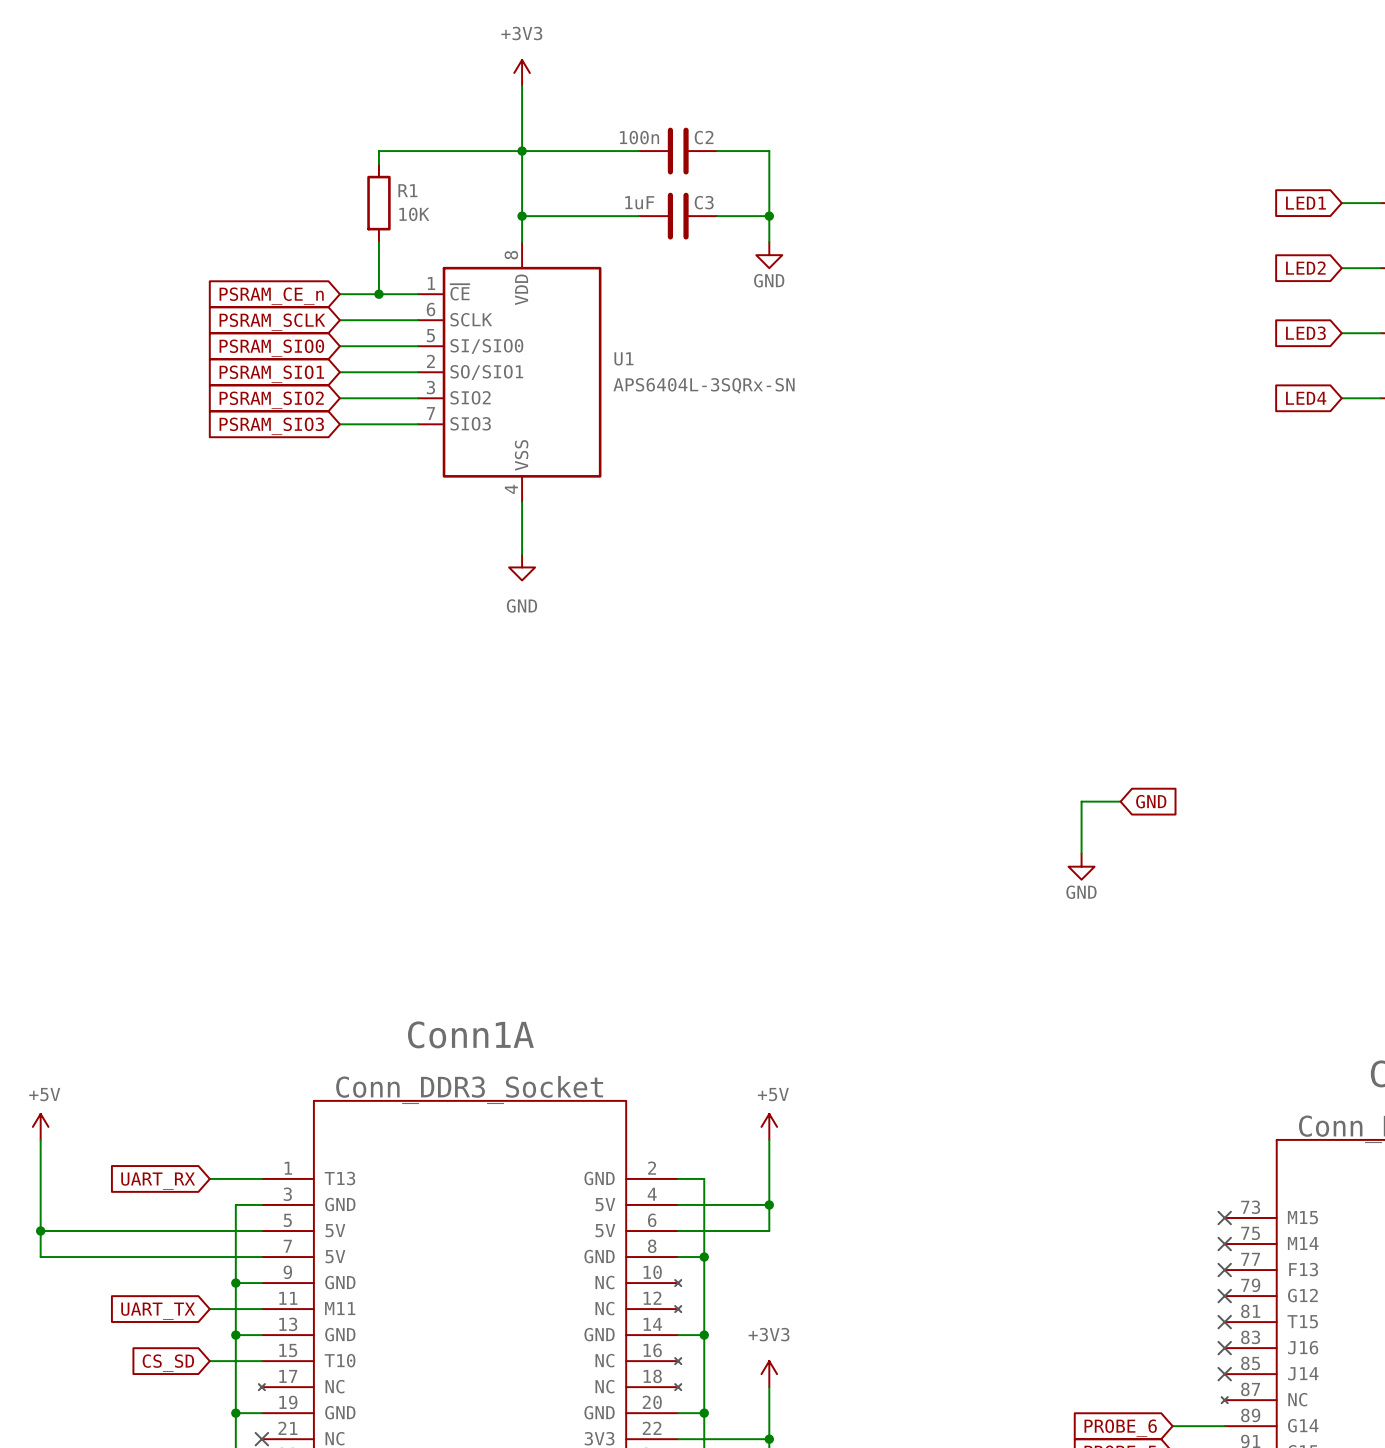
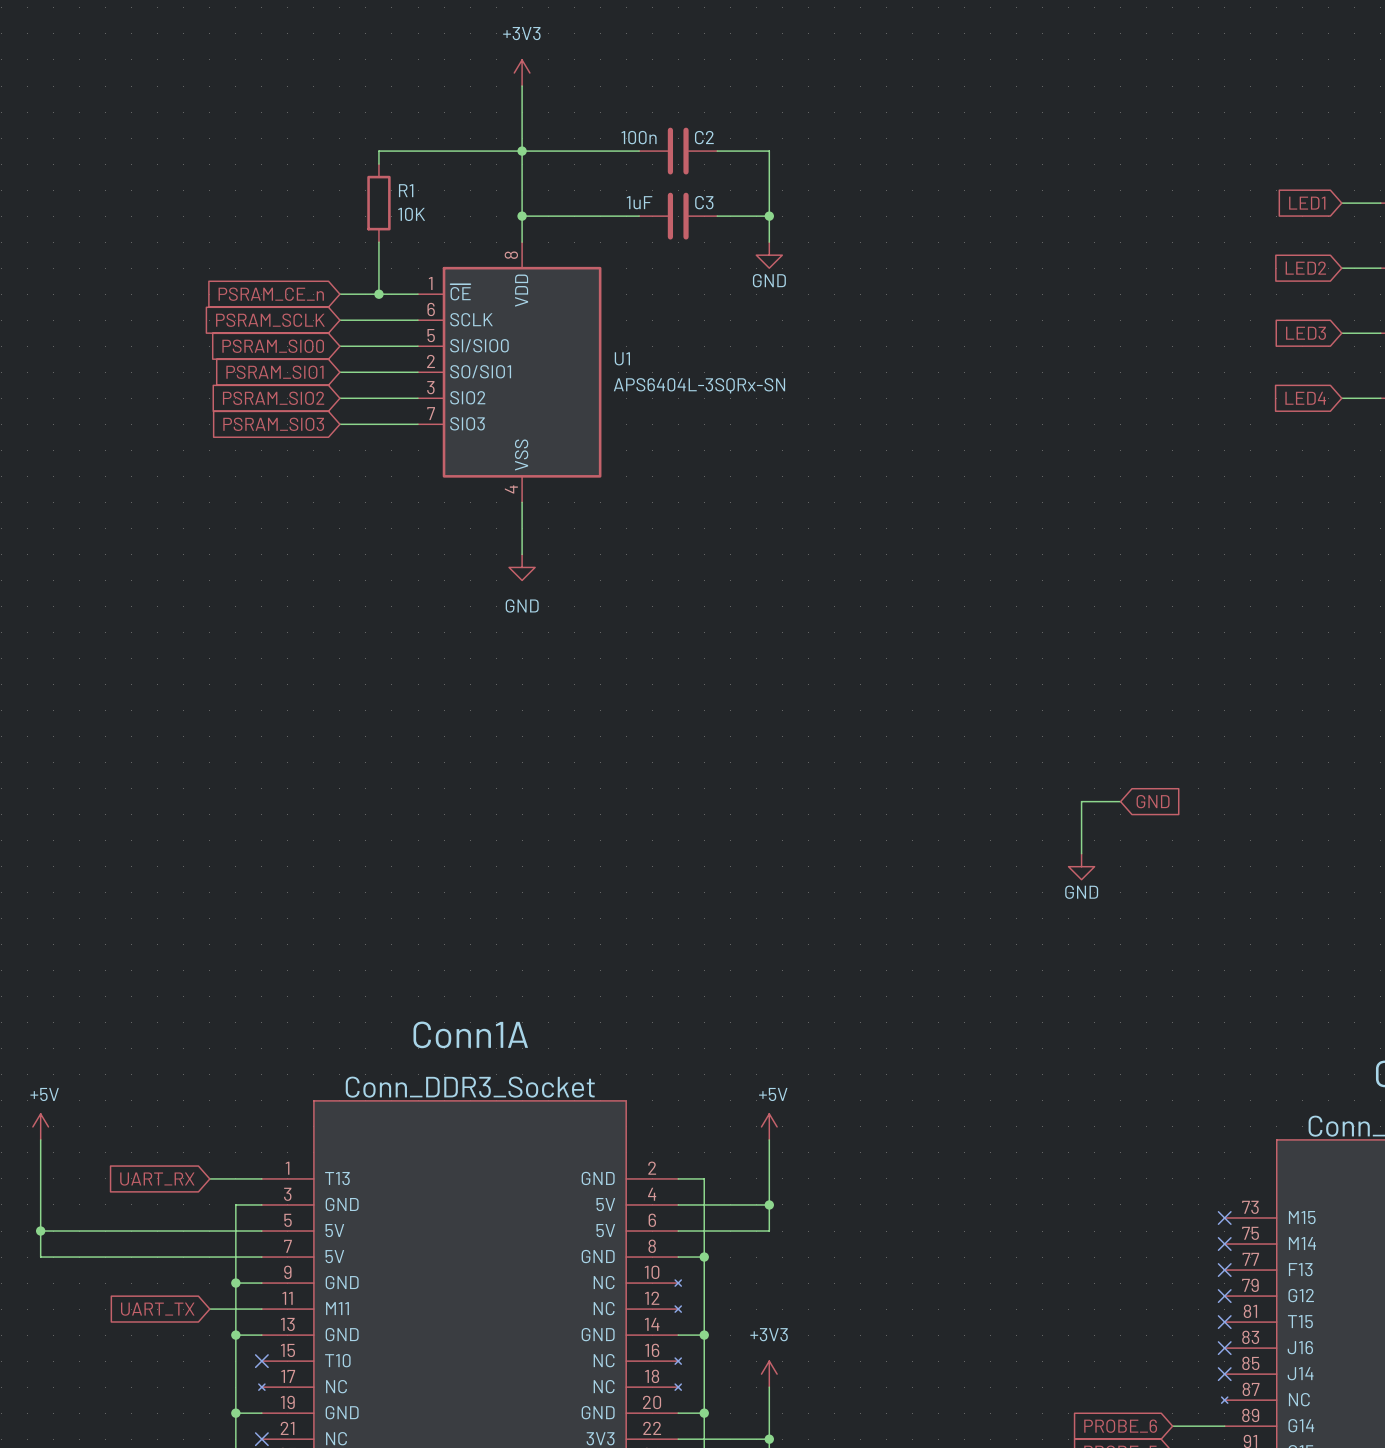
wire: (209, 1361) (261, 1361) -> none
no-connect mark: none -> (261, 1361)
global label: CS_SD (168, 1363) -> none

